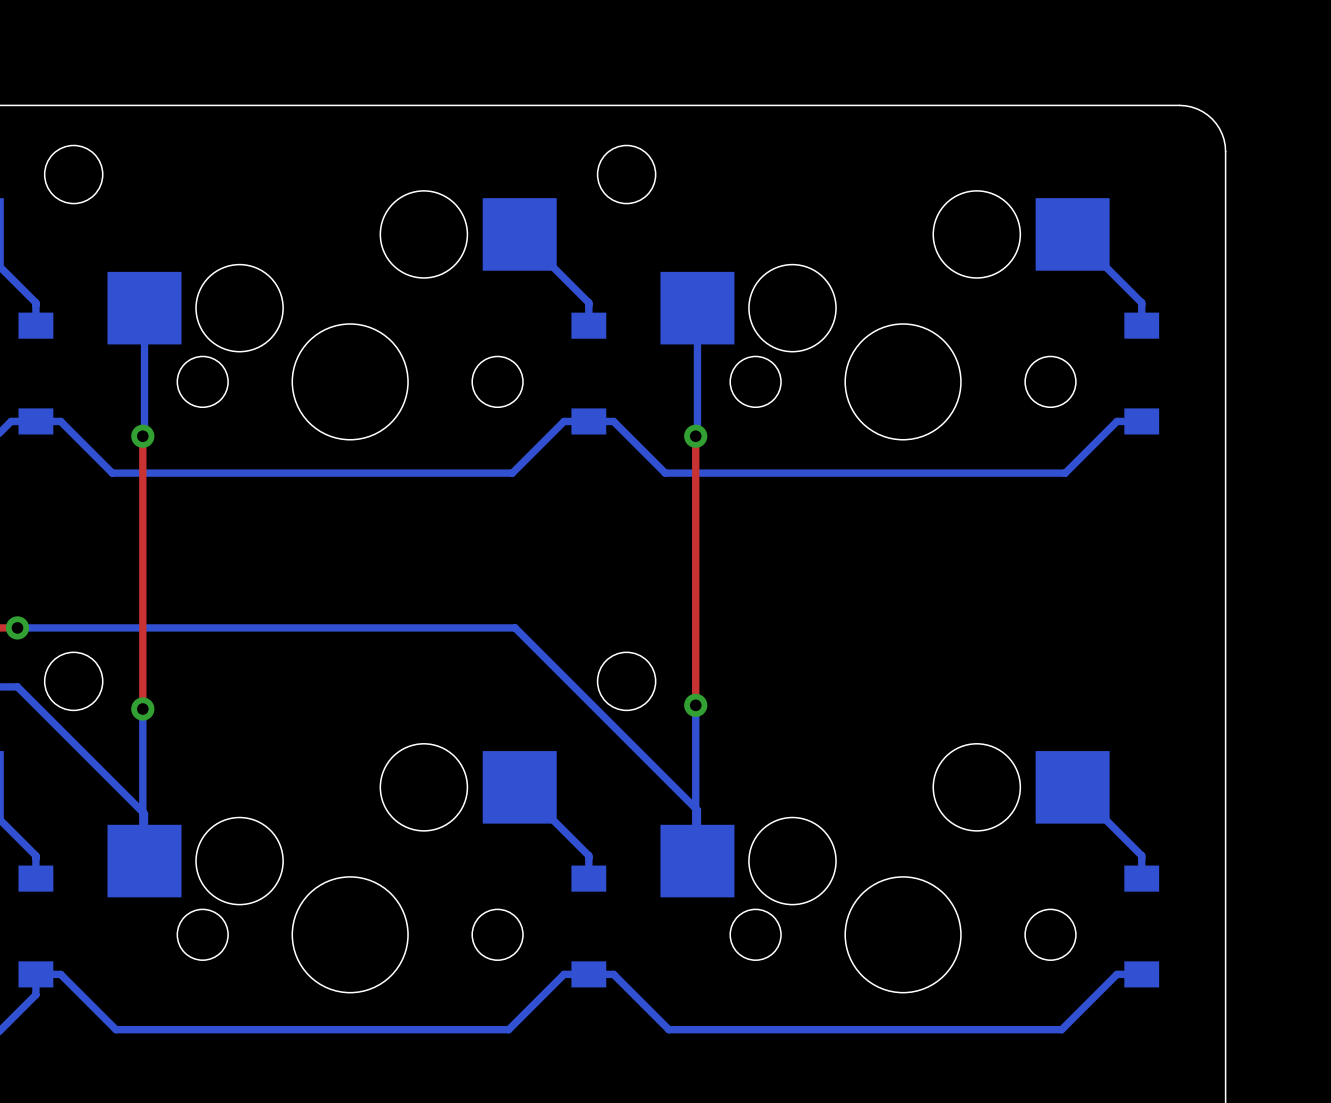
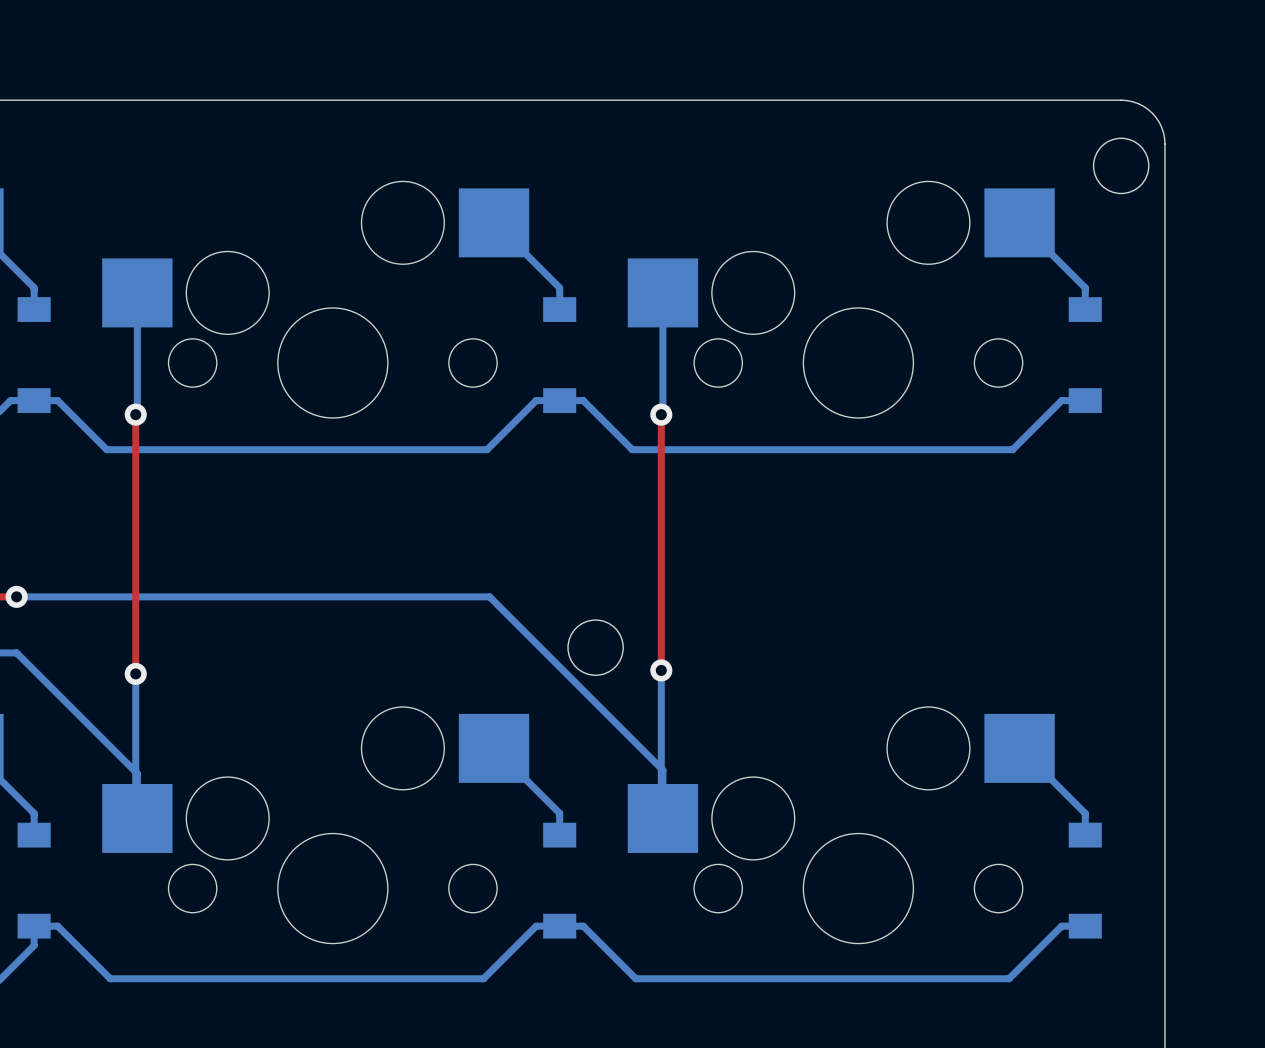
round board edge: [43, 144, 104, 205] -> none
round board edge: [596, 144, 657, 205] -> none
round board edge: none -> [1092, 137, 1150, 195]
round board edge: [43, 651, 104, 712] -> none

